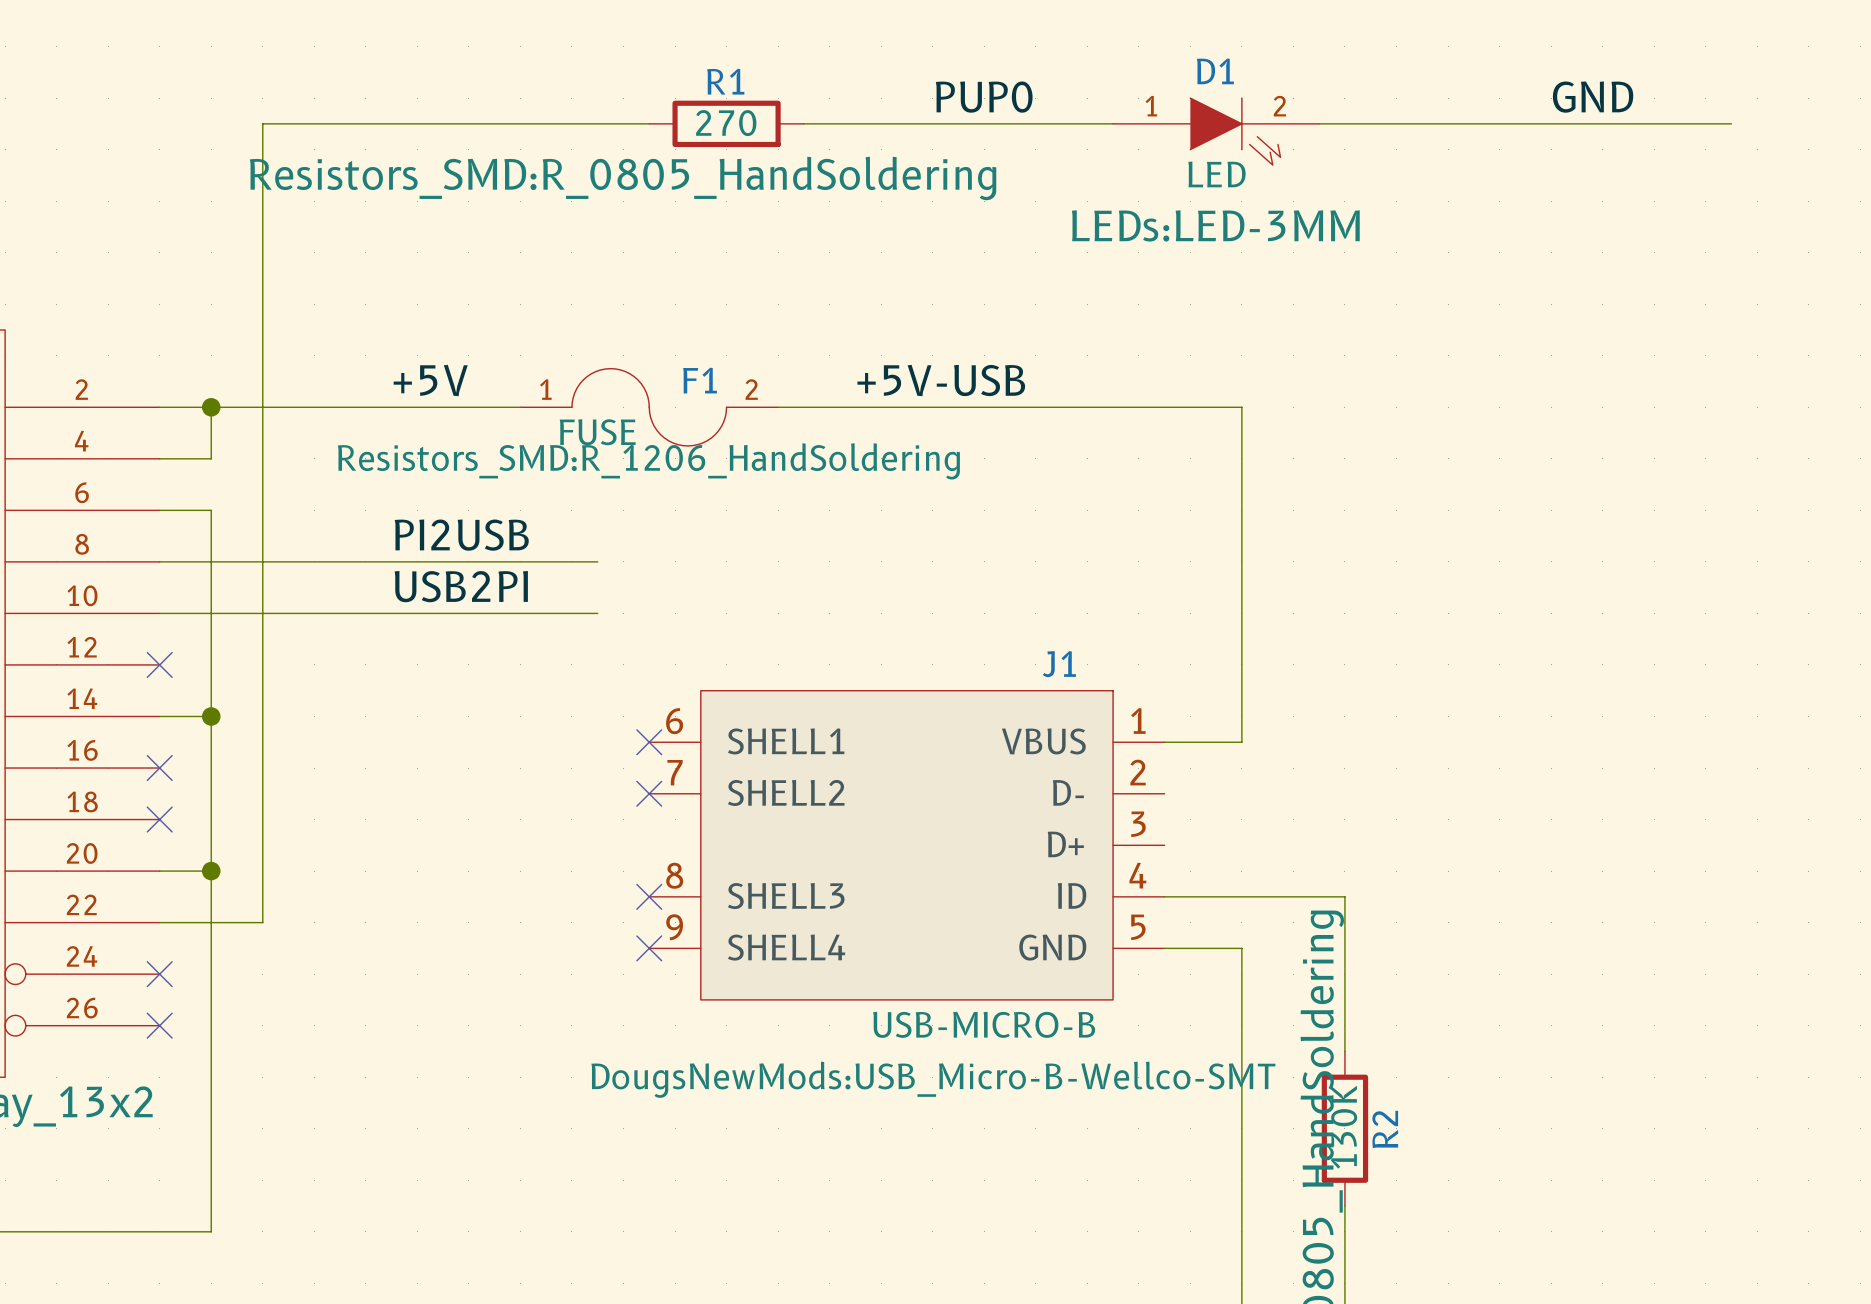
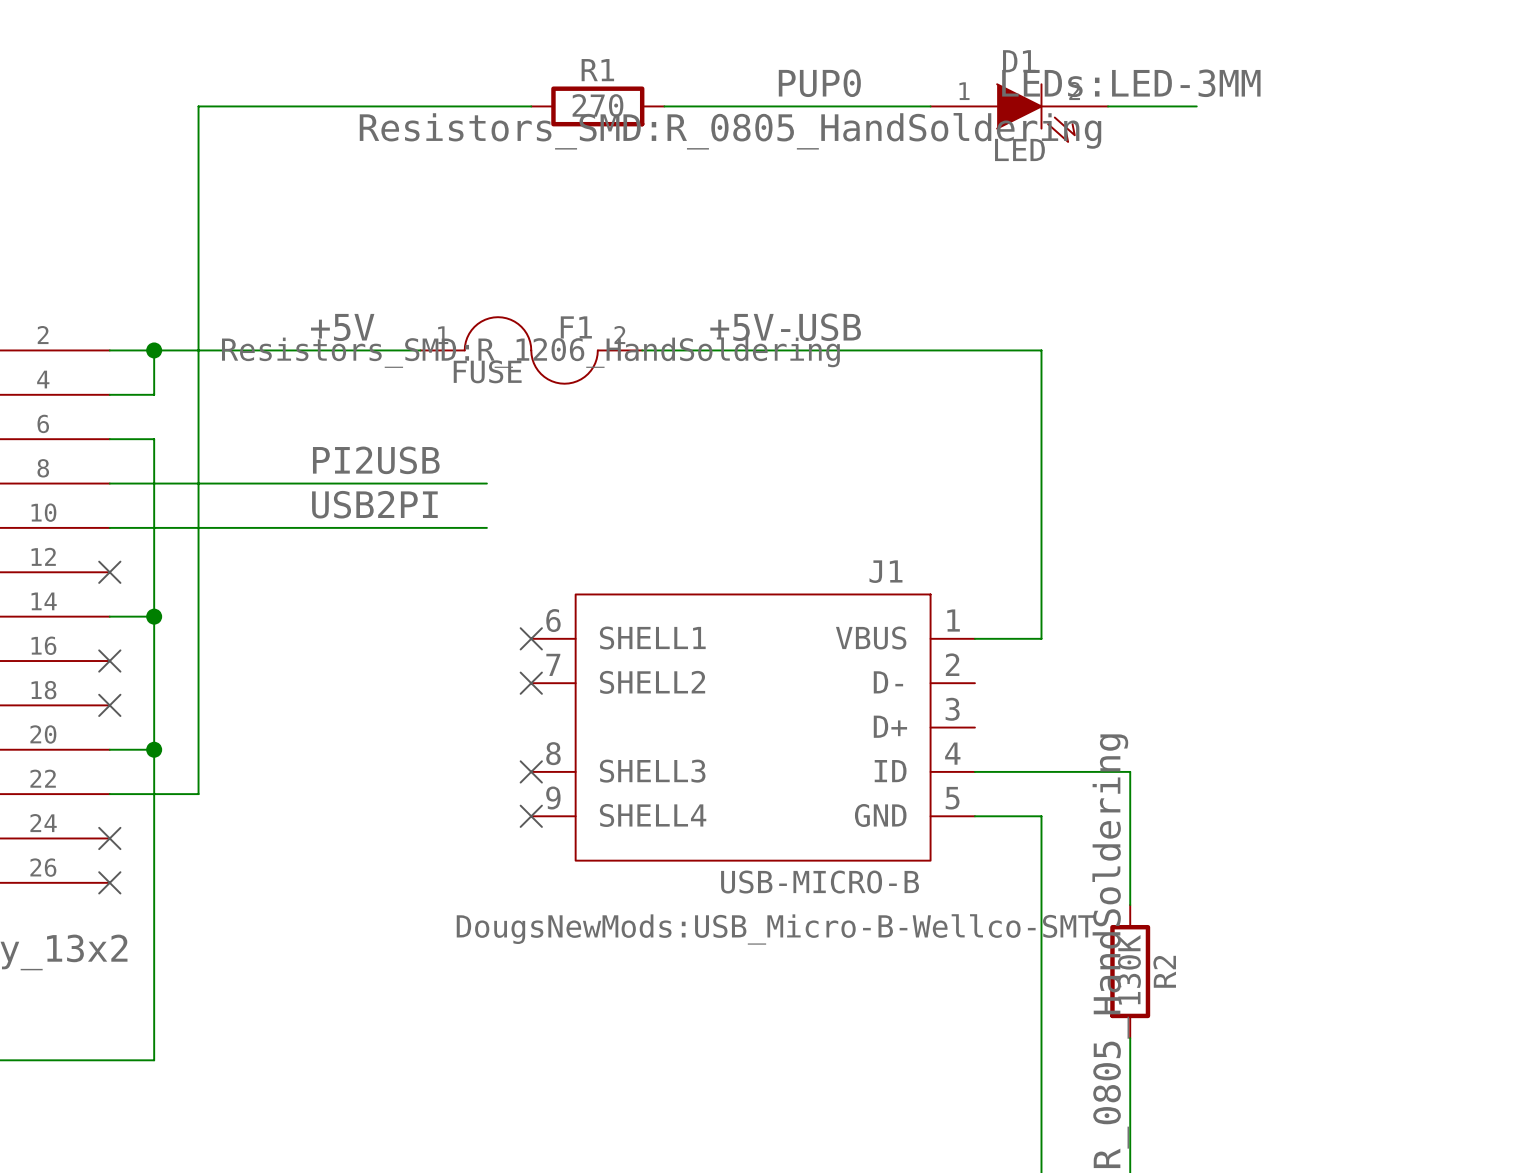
label: GND (1593, 97) -> none
wire: (1422, 123) (1731, 123) -> none
R1 text position: Resistors_SMD:R_0805_HandSoldering (623, 178) -> Resistors_SMD:R_0805_HandSoldering (730, 131)
D1 text position: LEDs:LED-3MM (1215, 225) -> LEDs:LED-3MM (1131, 83)
F1 text position: Resistors_SMD:R_1206_HandSoldering (648, 461) -> Resistors_SMD:R_1206_HandSoldering (530, 352)

